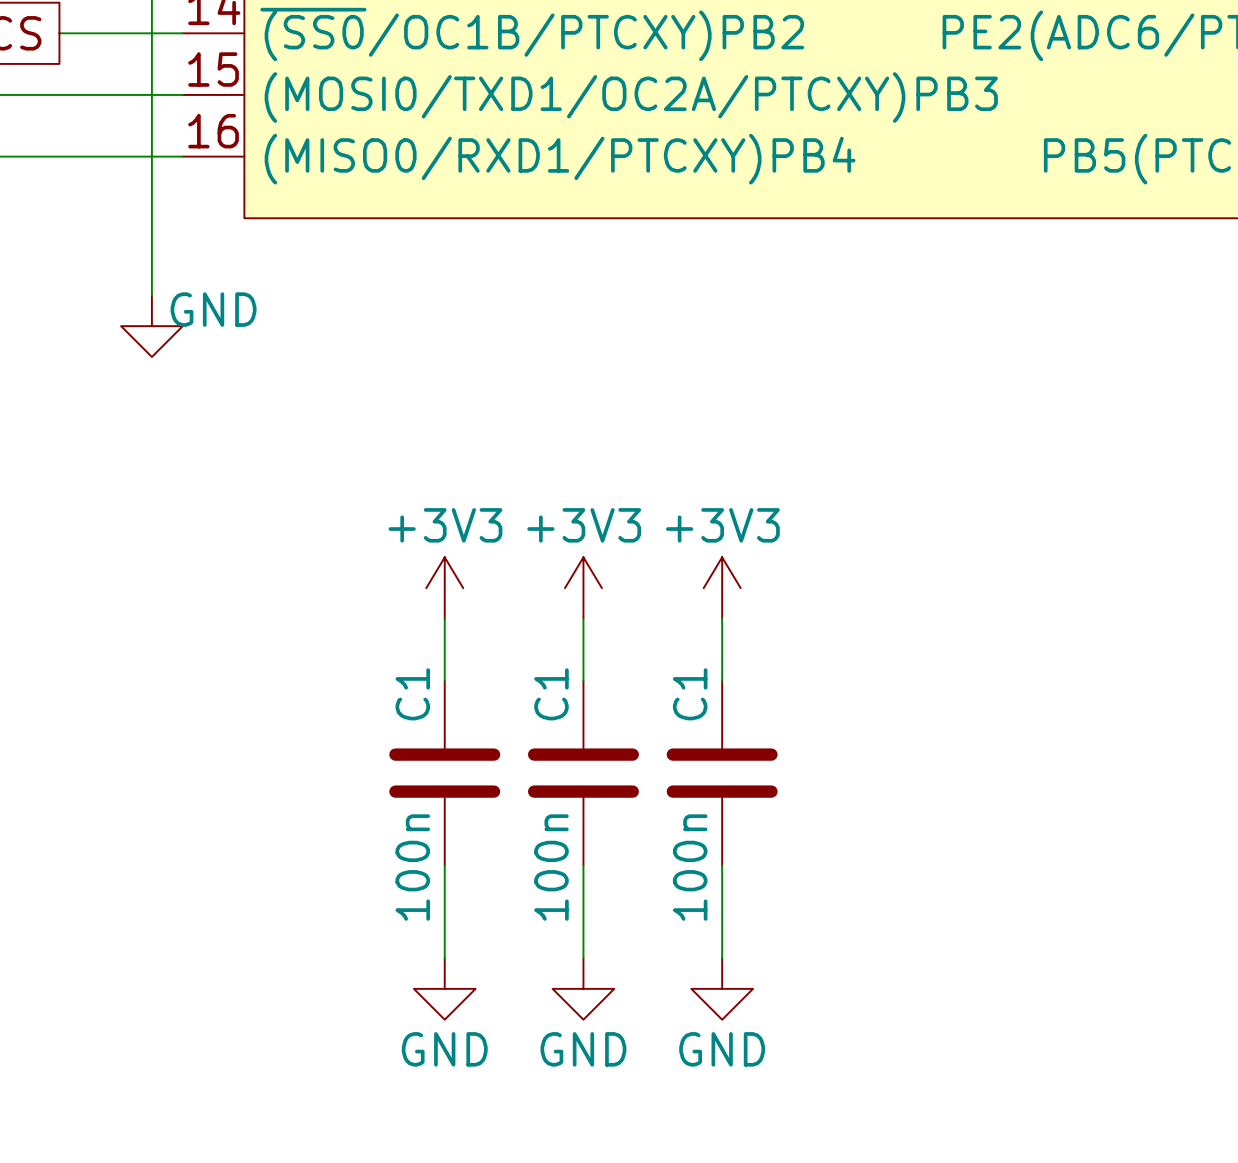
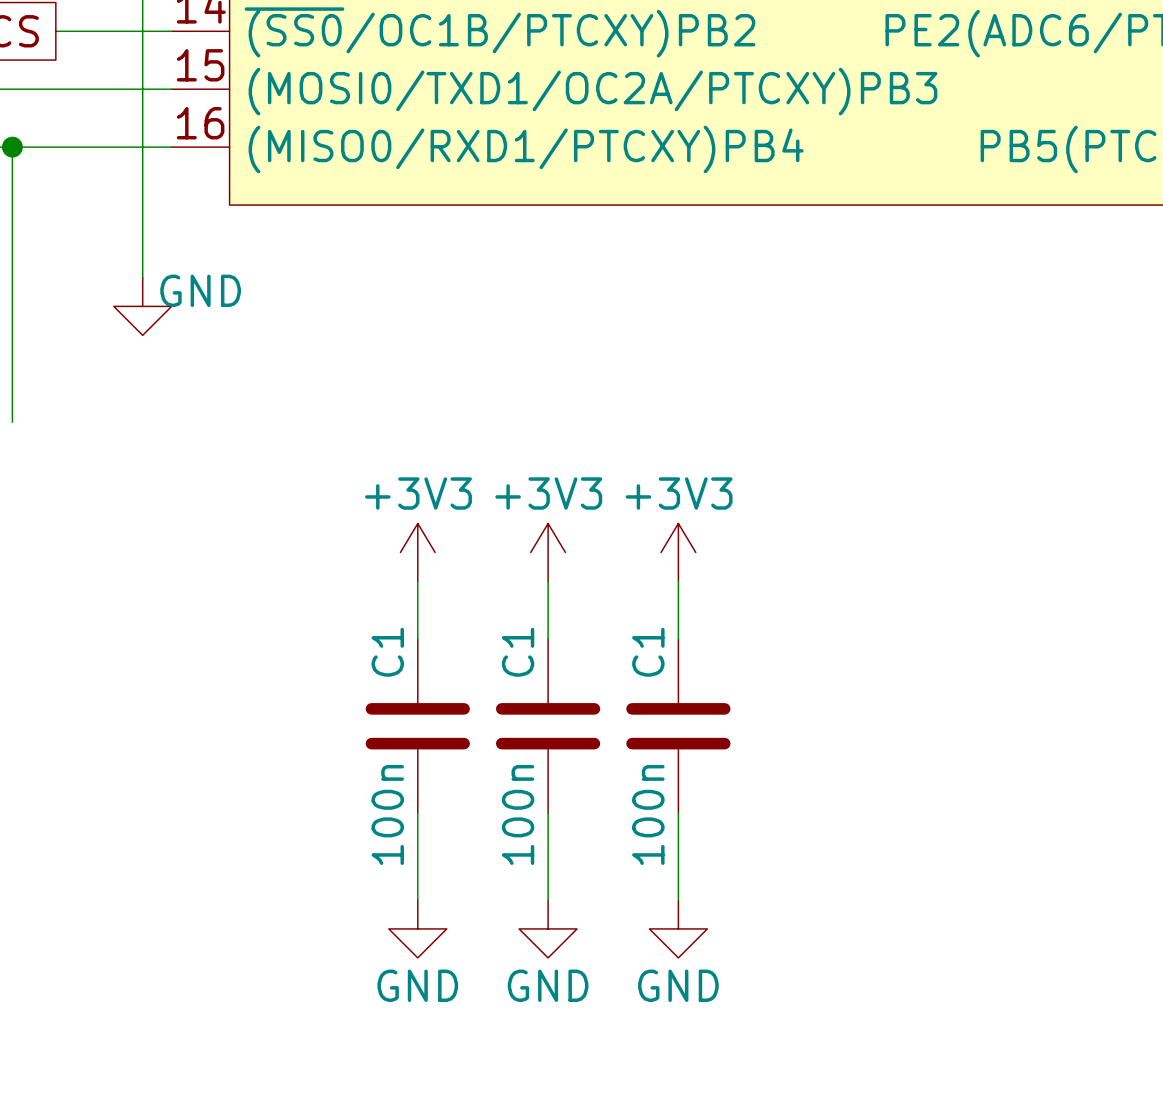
wire: none -> (12, 147) (12, 422)
junction: none -> (12, 147)

